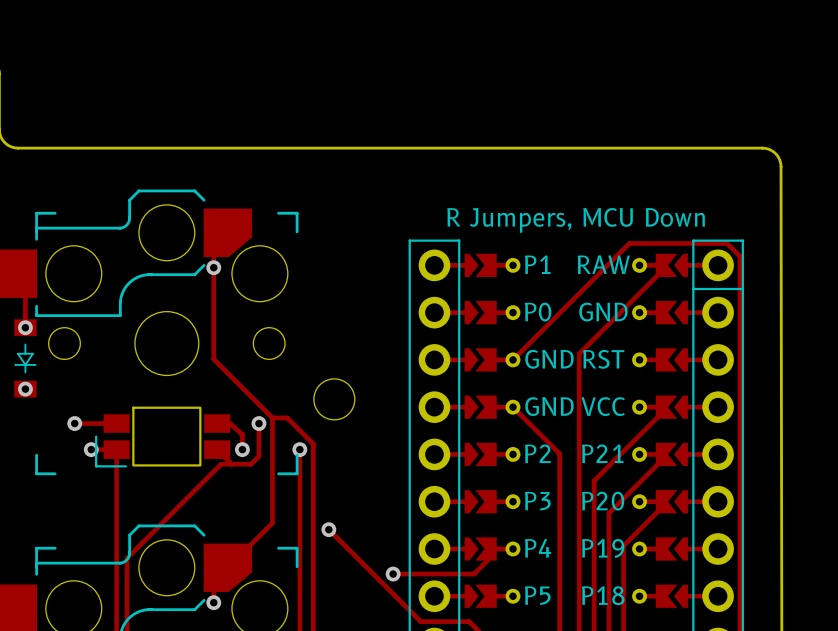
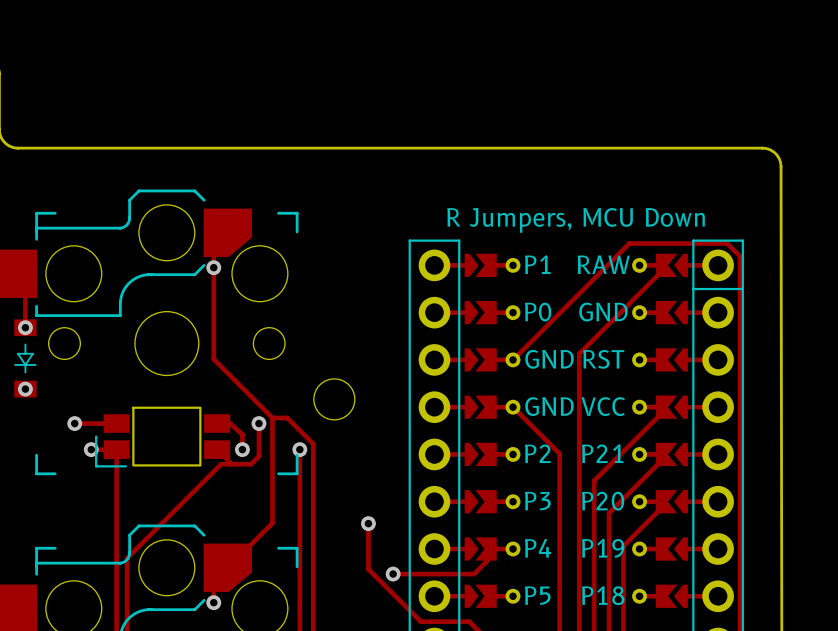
track: (328, 529) (368, 569) -> (368, 523) (368, 569)
via position: (328, 529) -> (368, 523)

